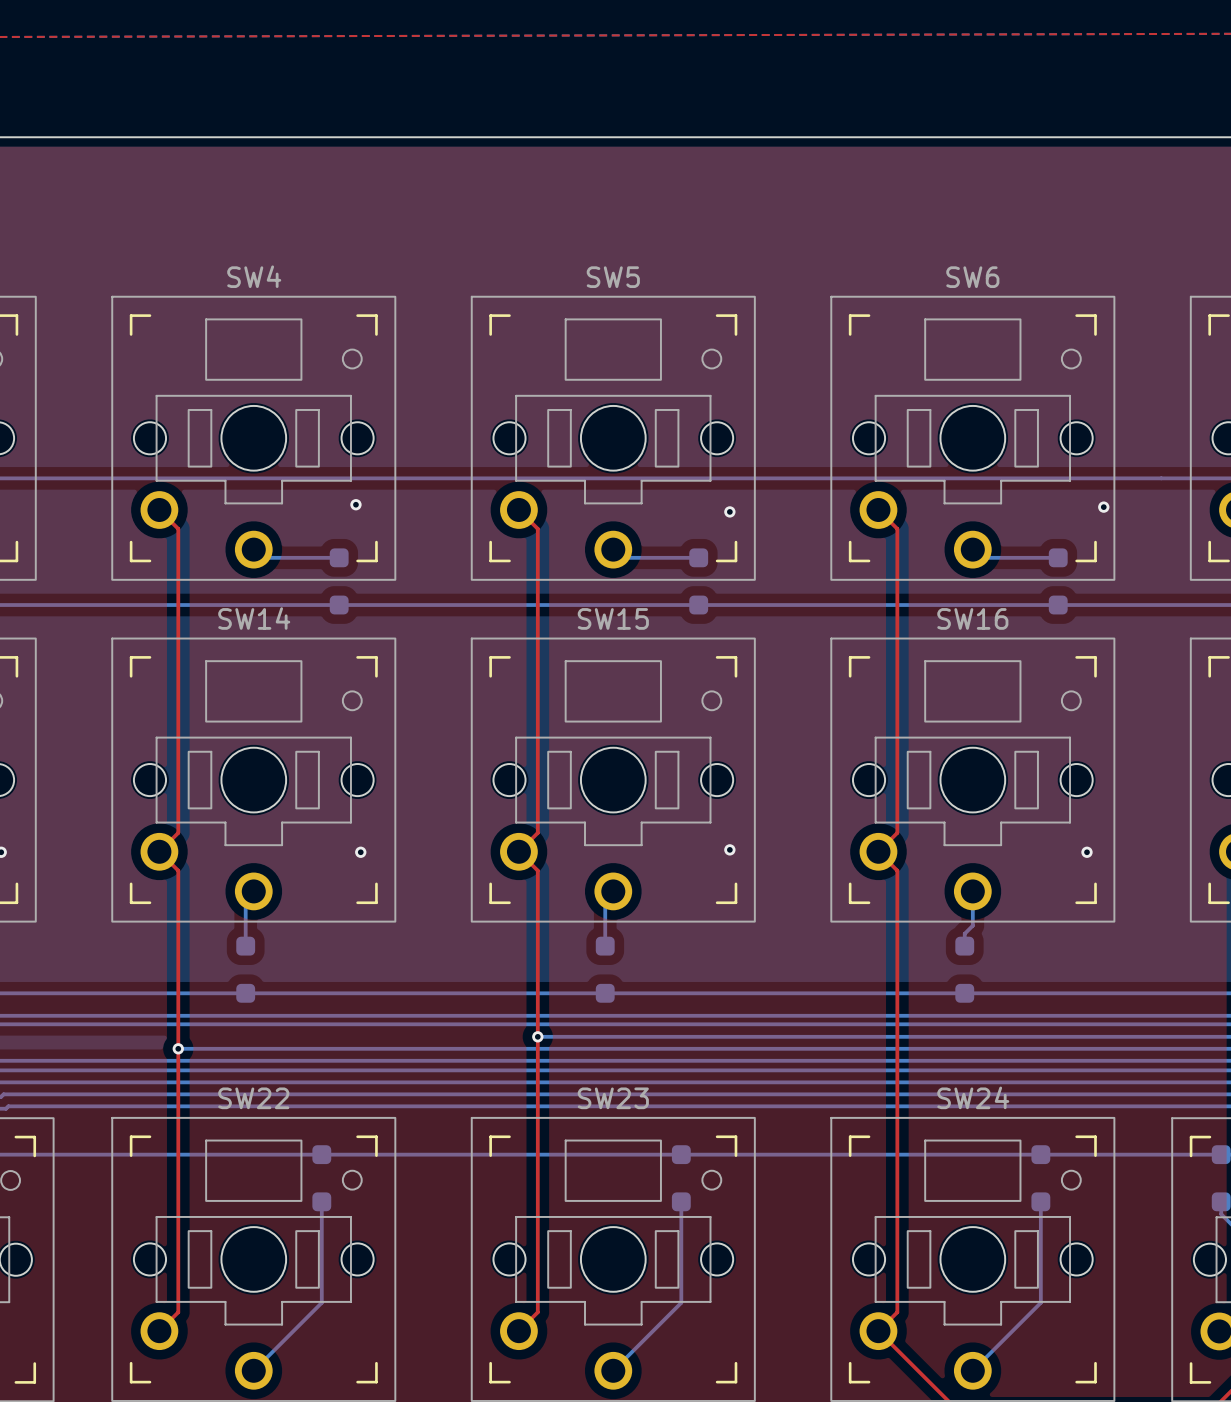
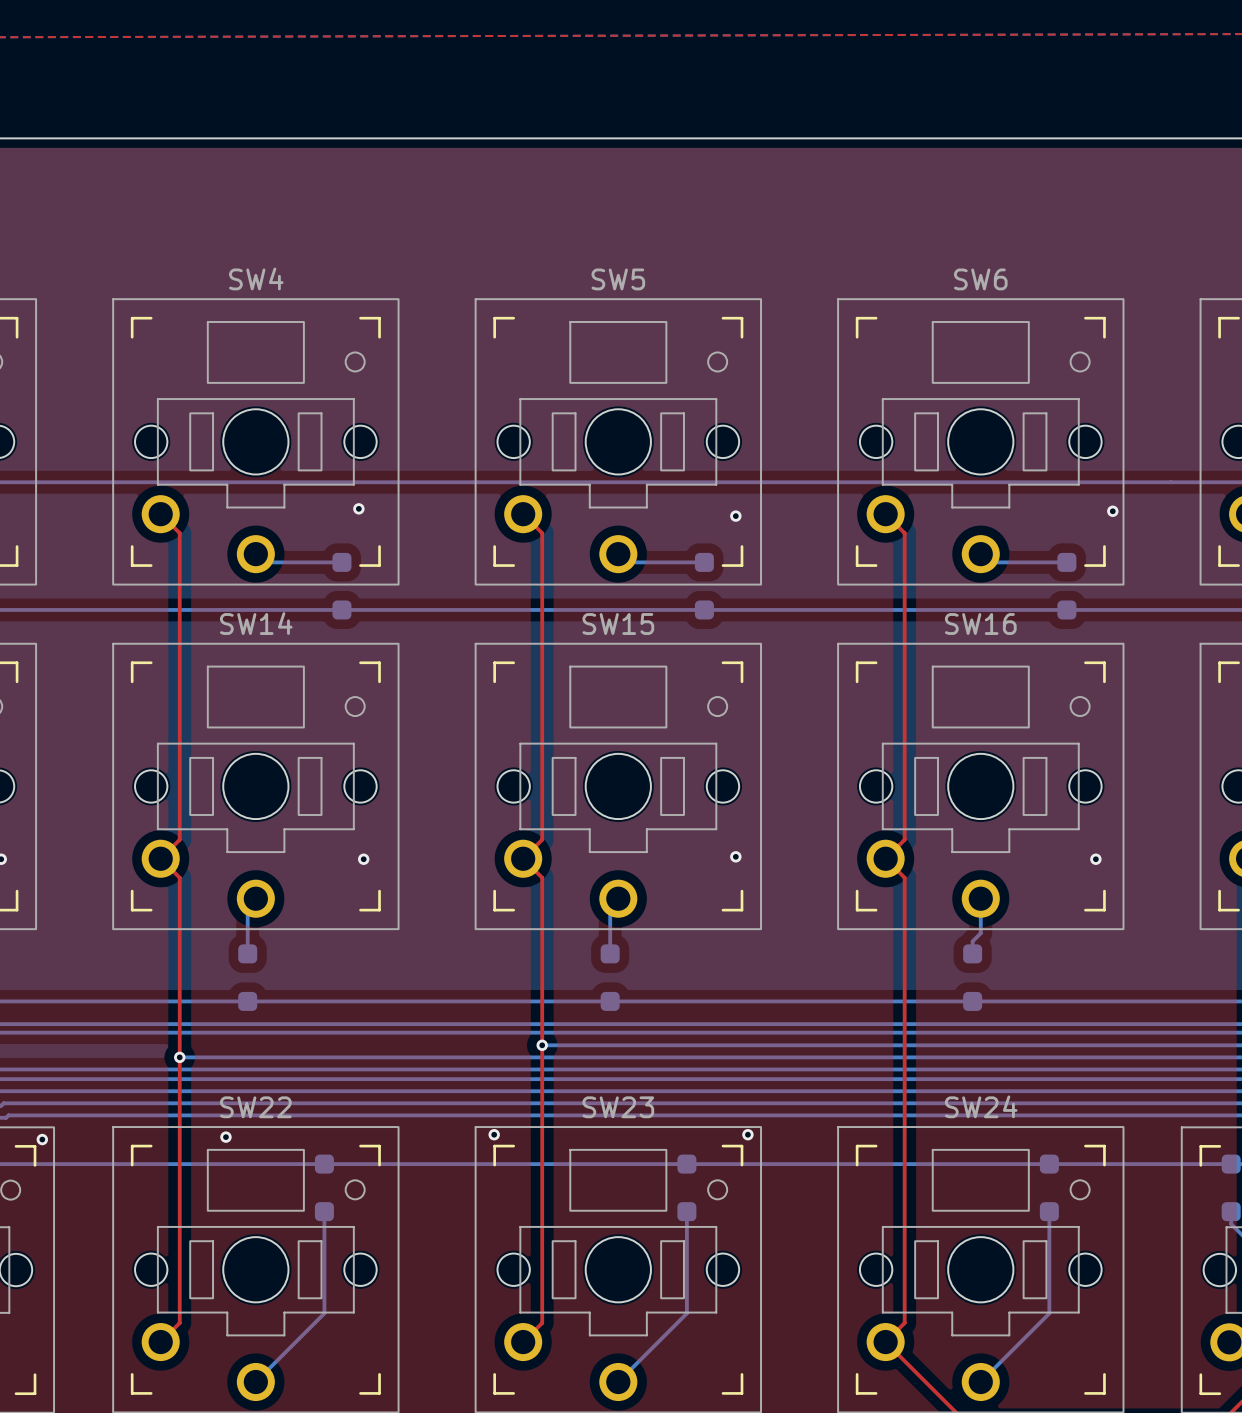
via: none -> (494, 1134)
via: none -> (747, 1134)
via: none -> (225, 1137)
via: none -> (42, 1139)

